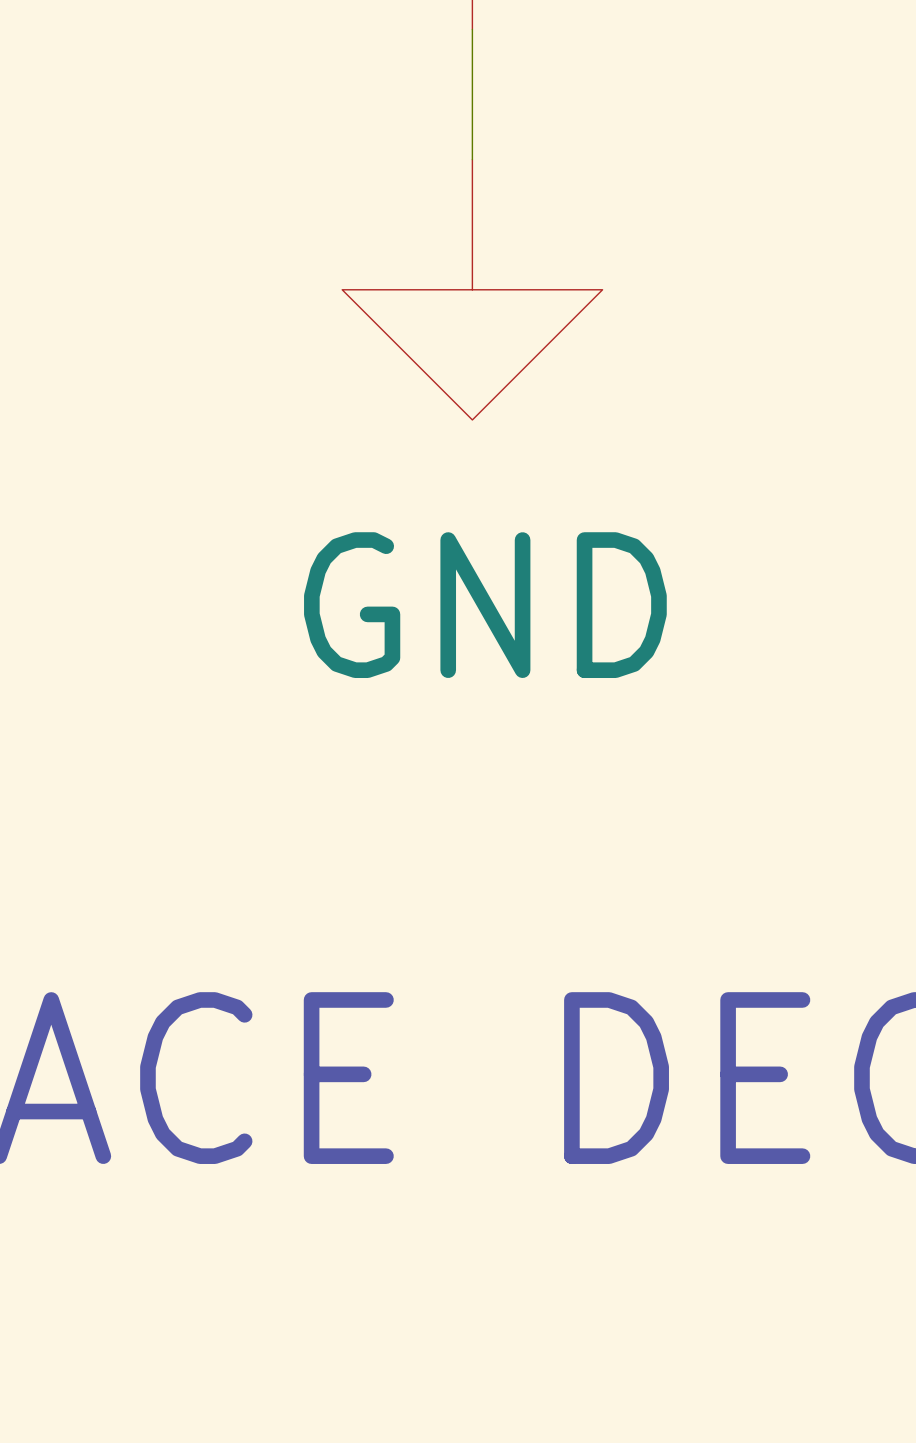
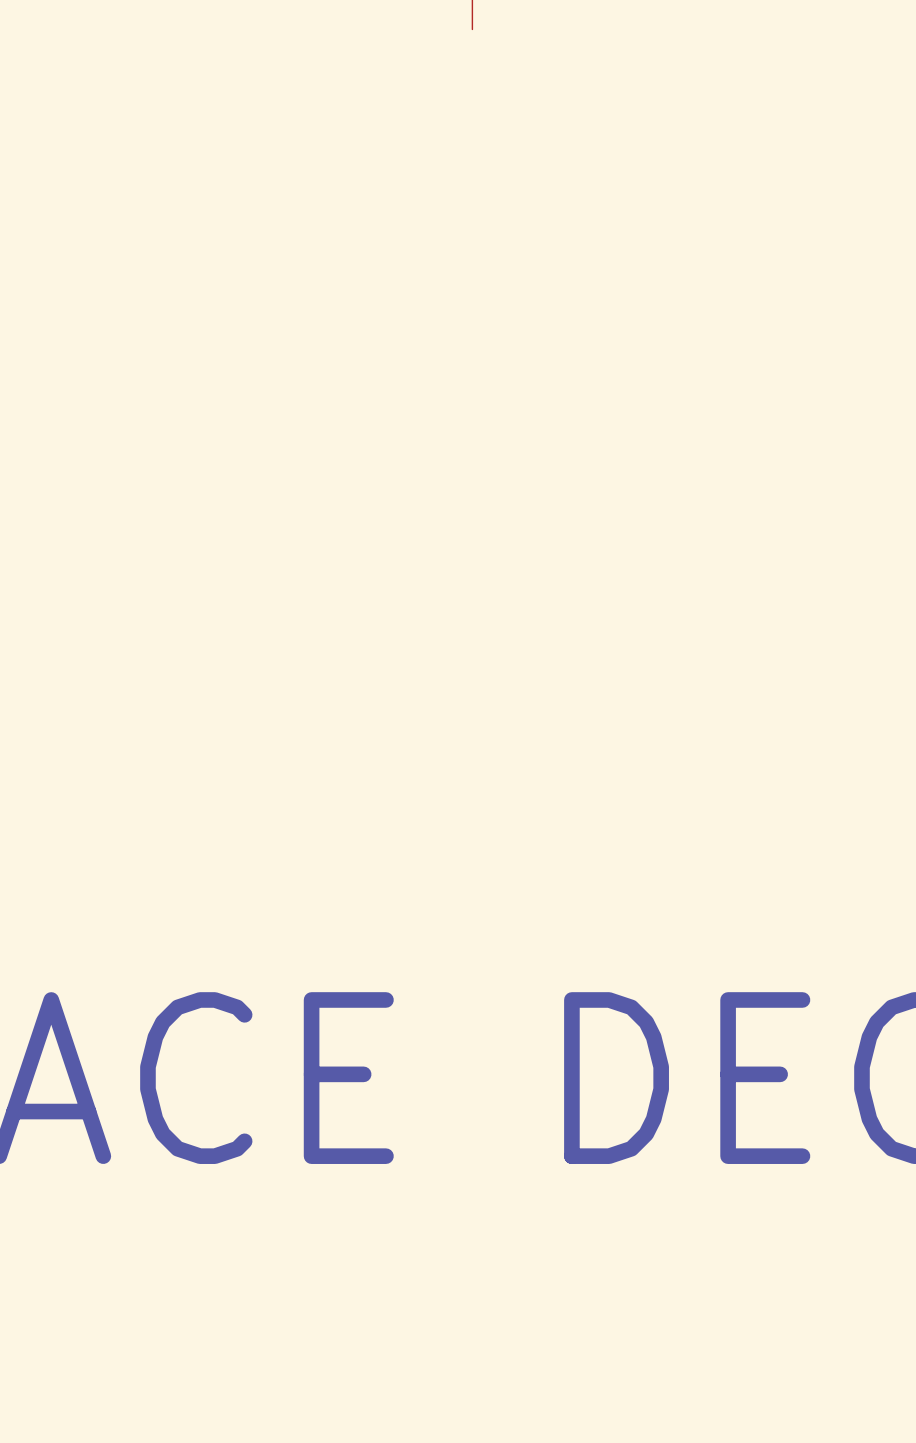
wire: (472, 29) (472, 159) -> none
power symbol: GND (472, 289) -> none

